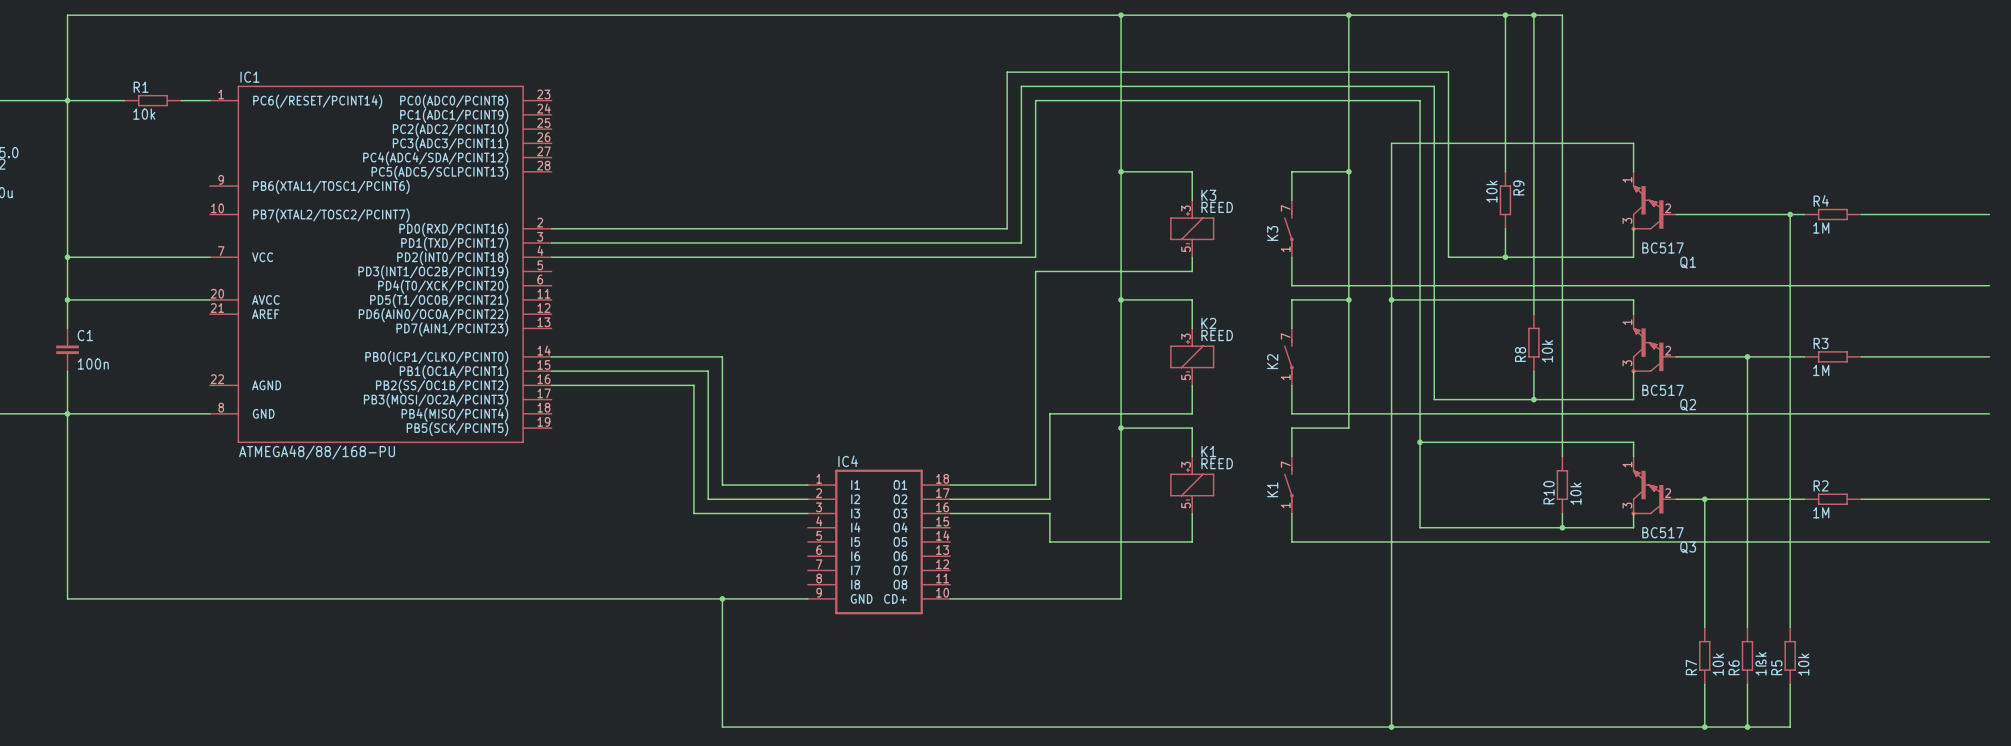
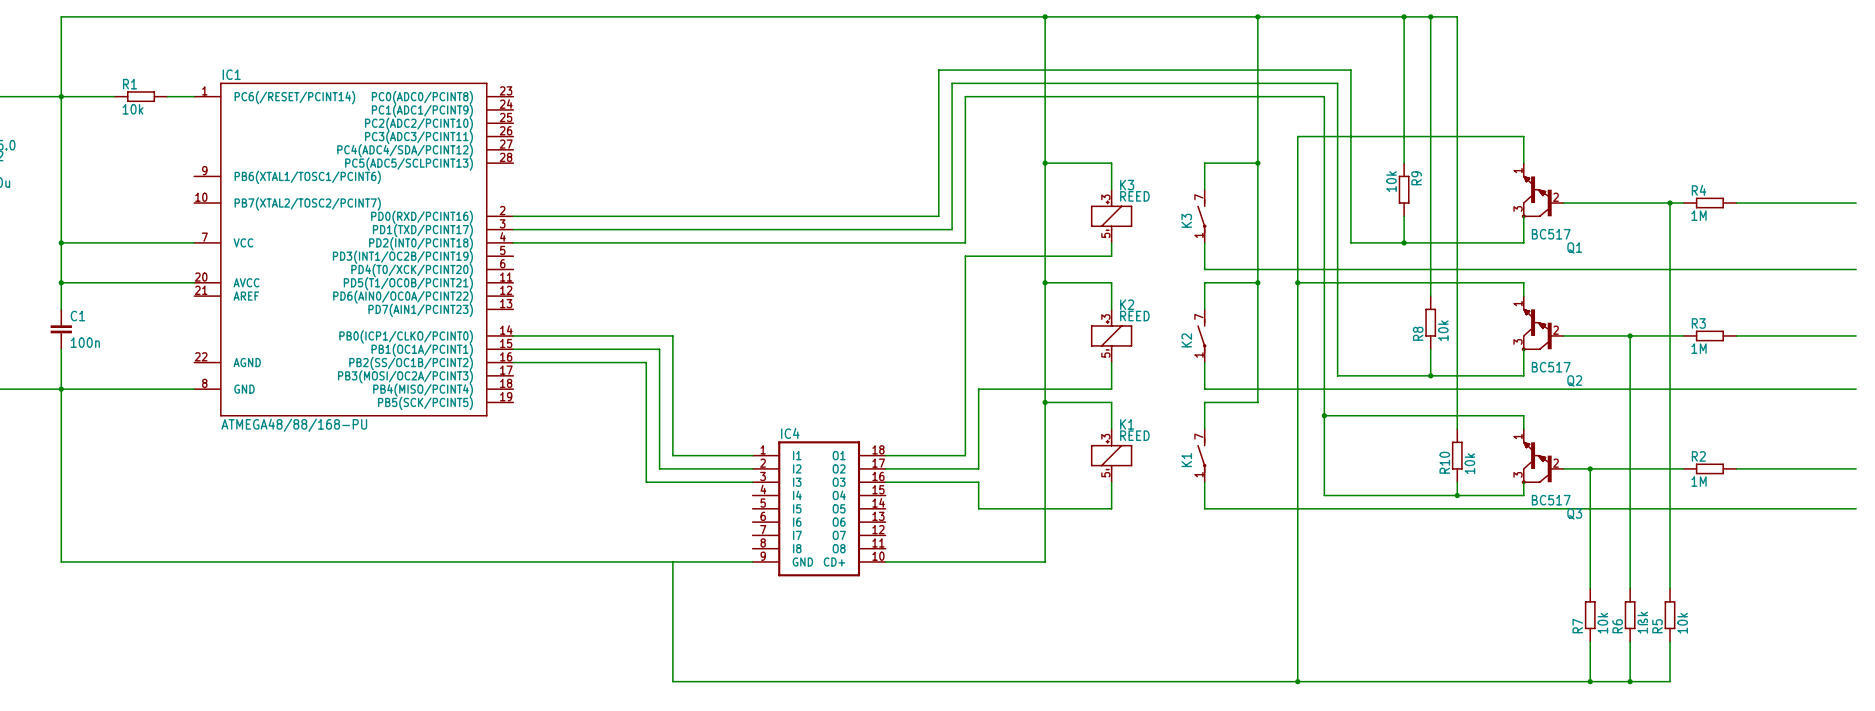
junction: (722, 598) -> none

